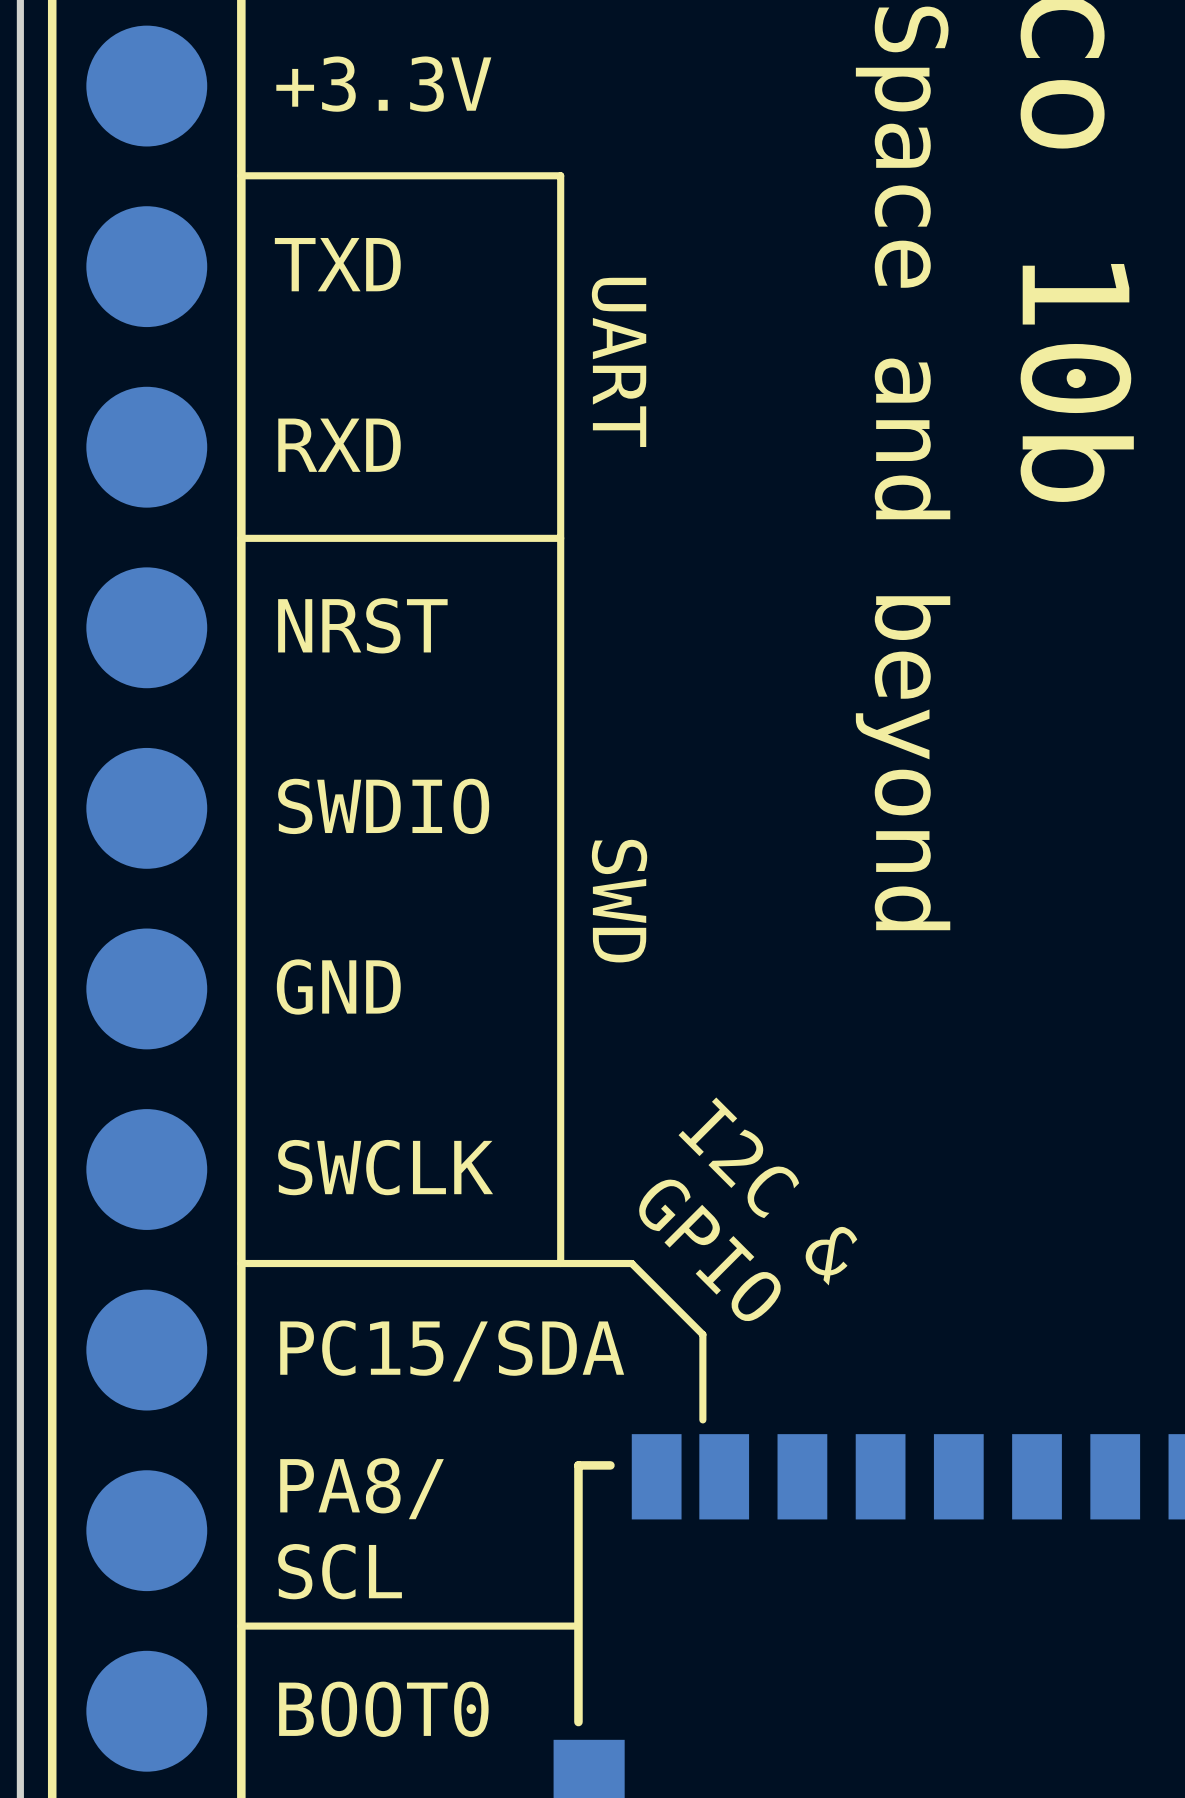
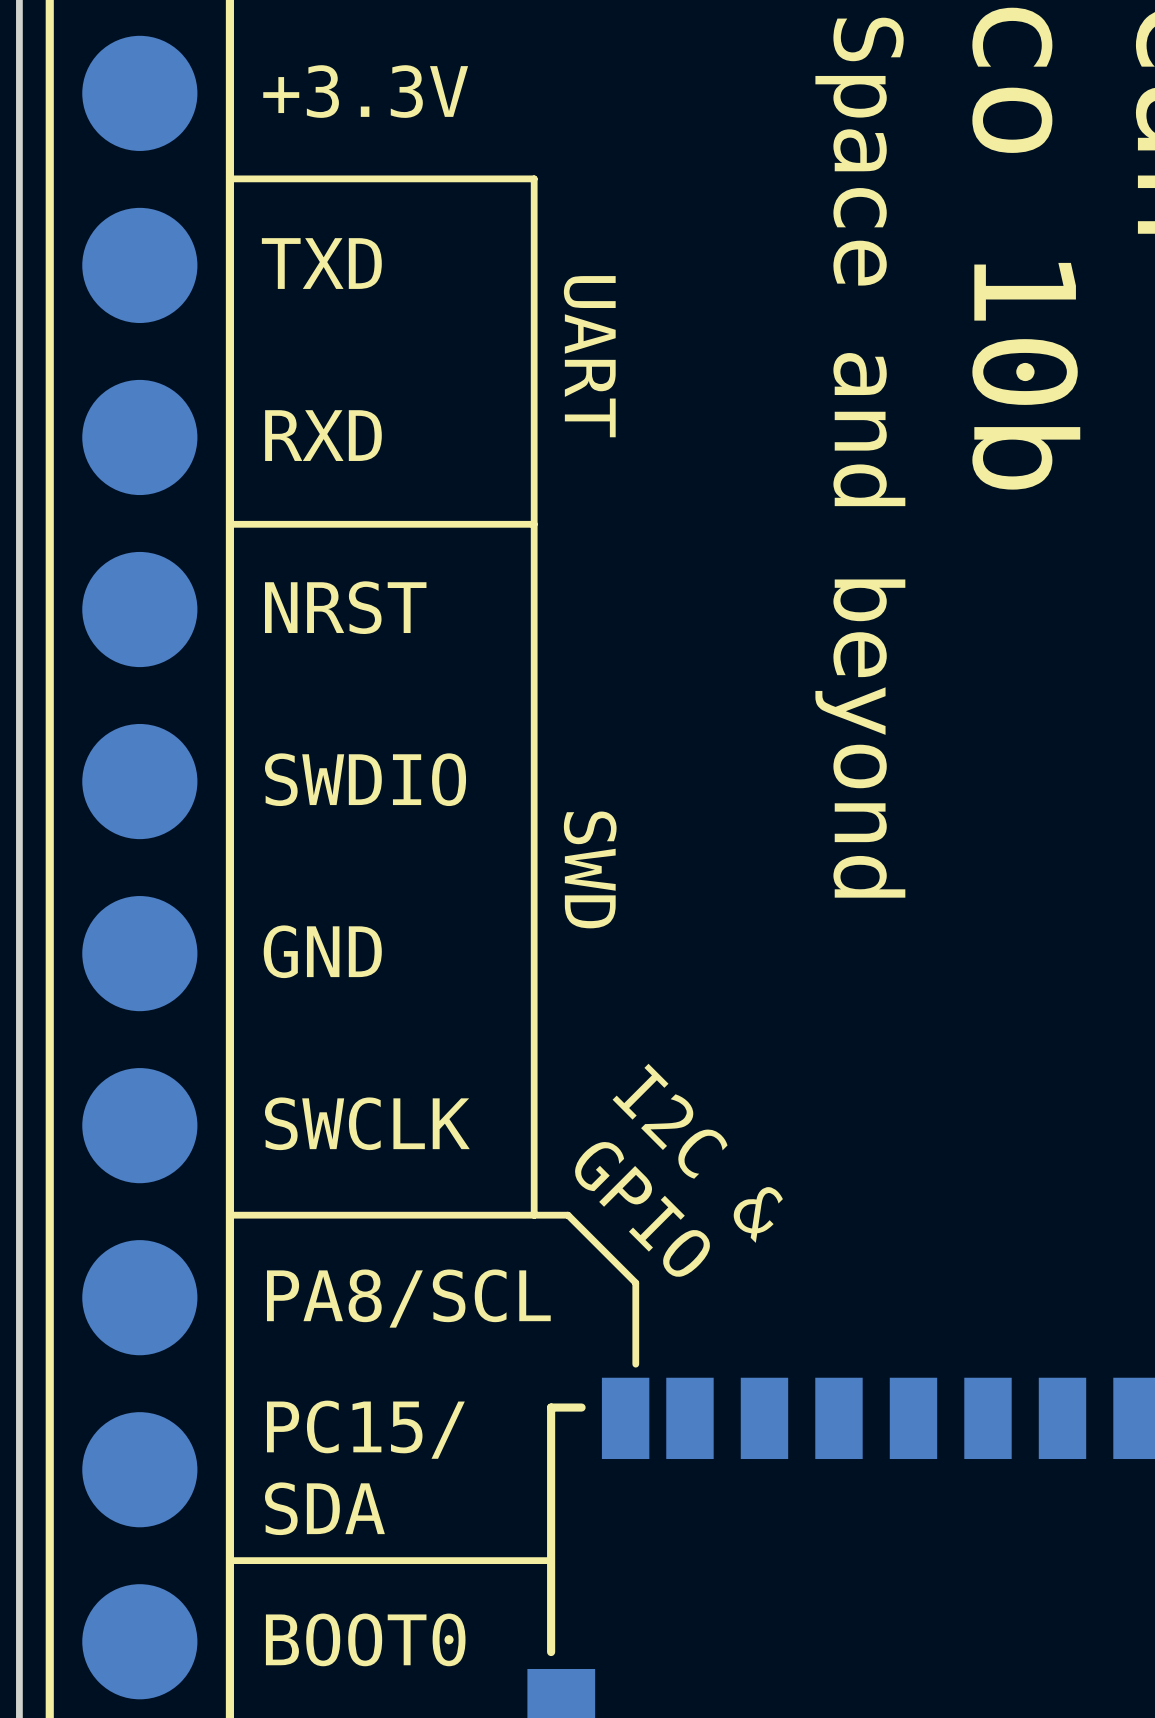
text position: I2C & (767, 1191) -> I2C & (697, 1153)
text position: GPIO (710, 1250) -> GPIO (642, 1209)
line: (596, 1263) (631, 1263) (702, 1334) (702, 1419) -> (568, 1215) (635, 1282) (635, 1364)
text: PC15/SDA (452, 1351) -> PA8/SCL (408, 1298)
text: PA8/ (362, 1488) -> PC15/ (365, 1429)
text: SCL (340, 1571) -> SDA (324, 1508)

